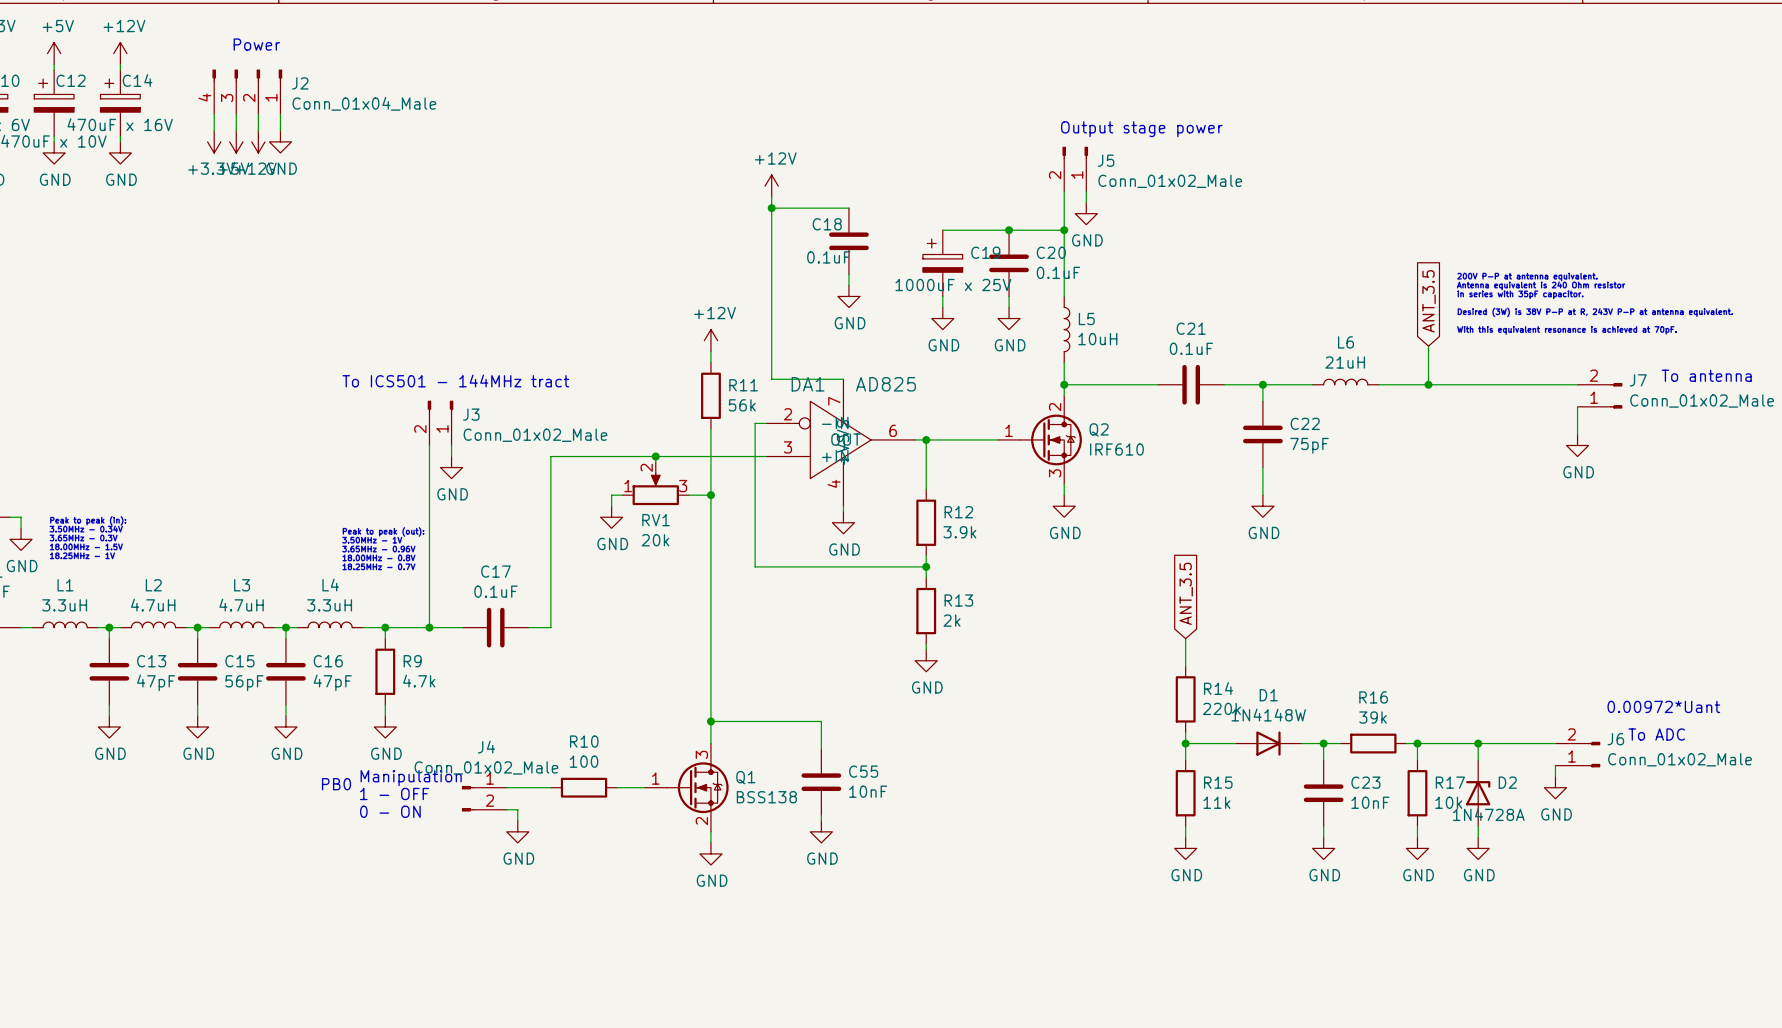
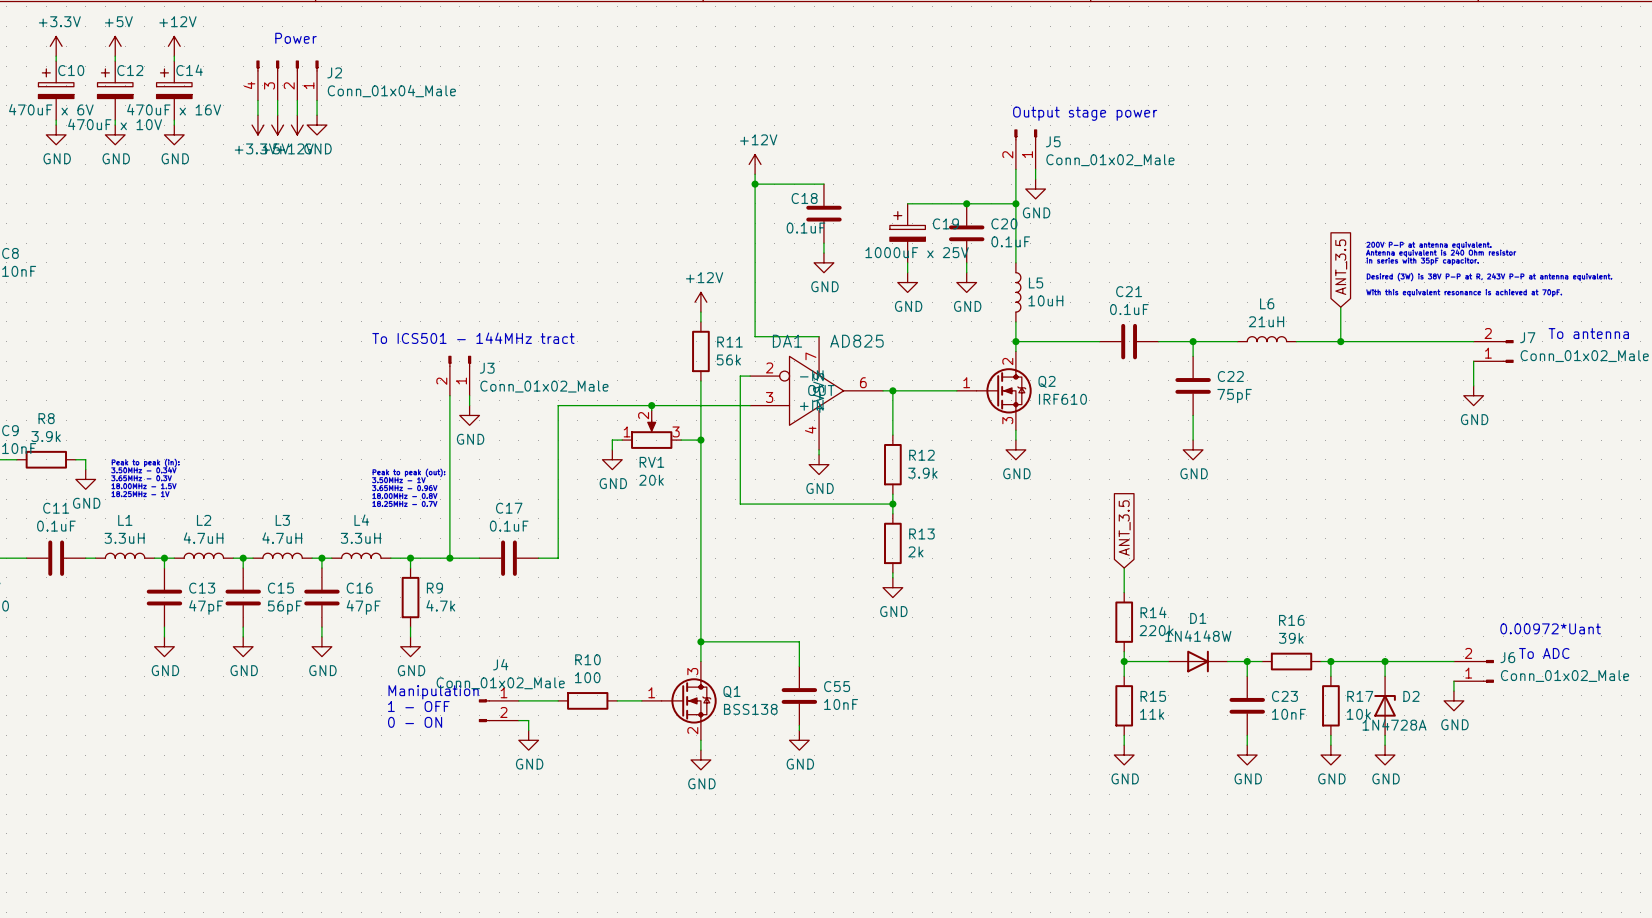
text: PB0 (336, 784) -> none

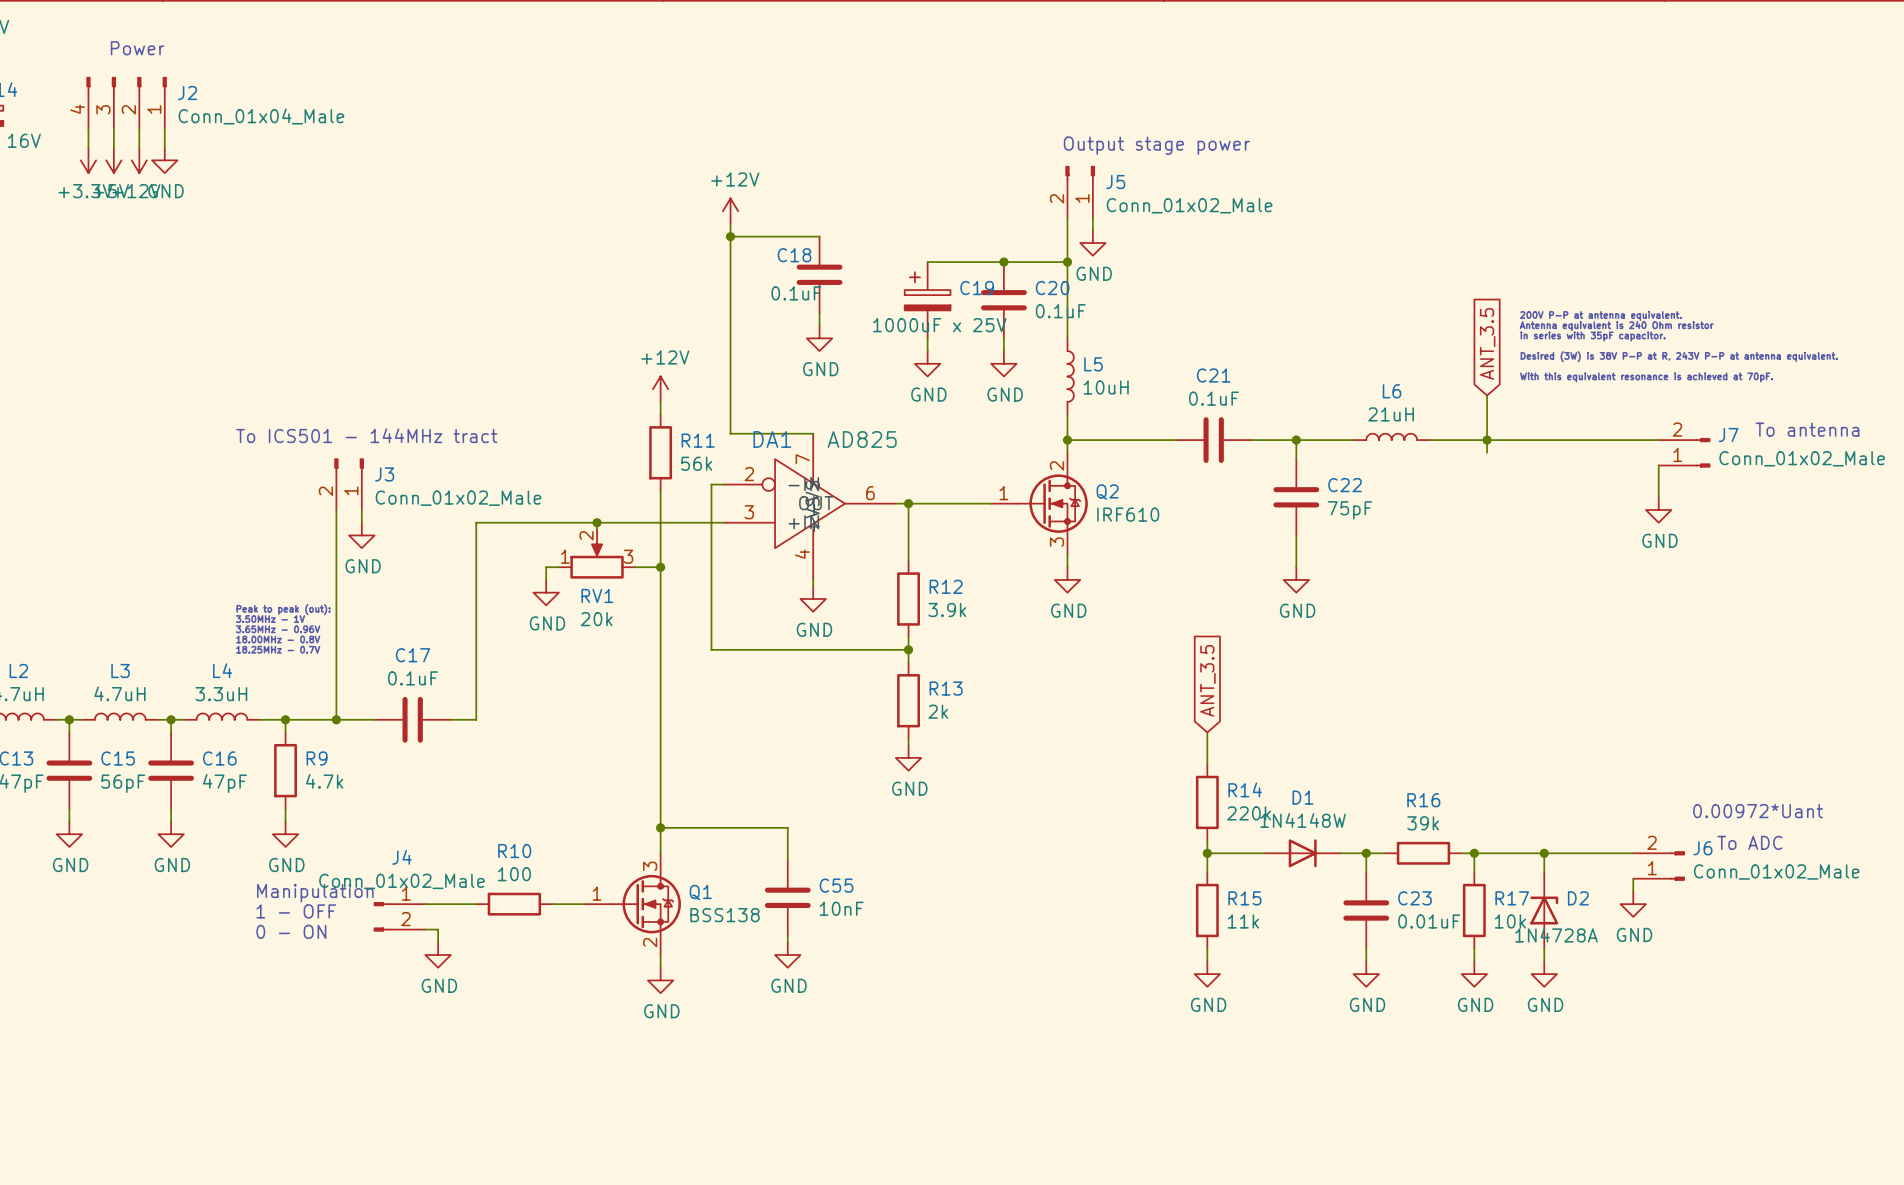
wire: none -> (1487, 440) (1487, 452)
C23 value: 10nF (1288, 714) -> 0.01uF (1429, 921)

